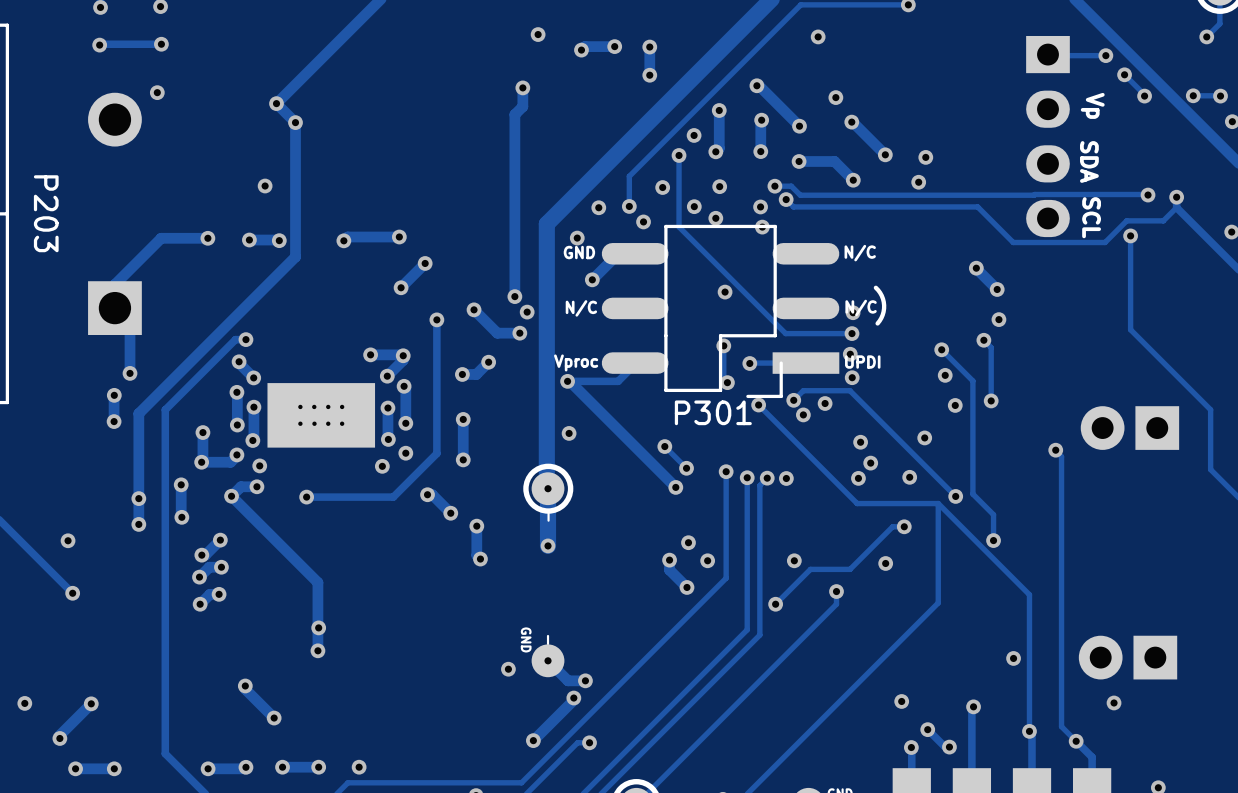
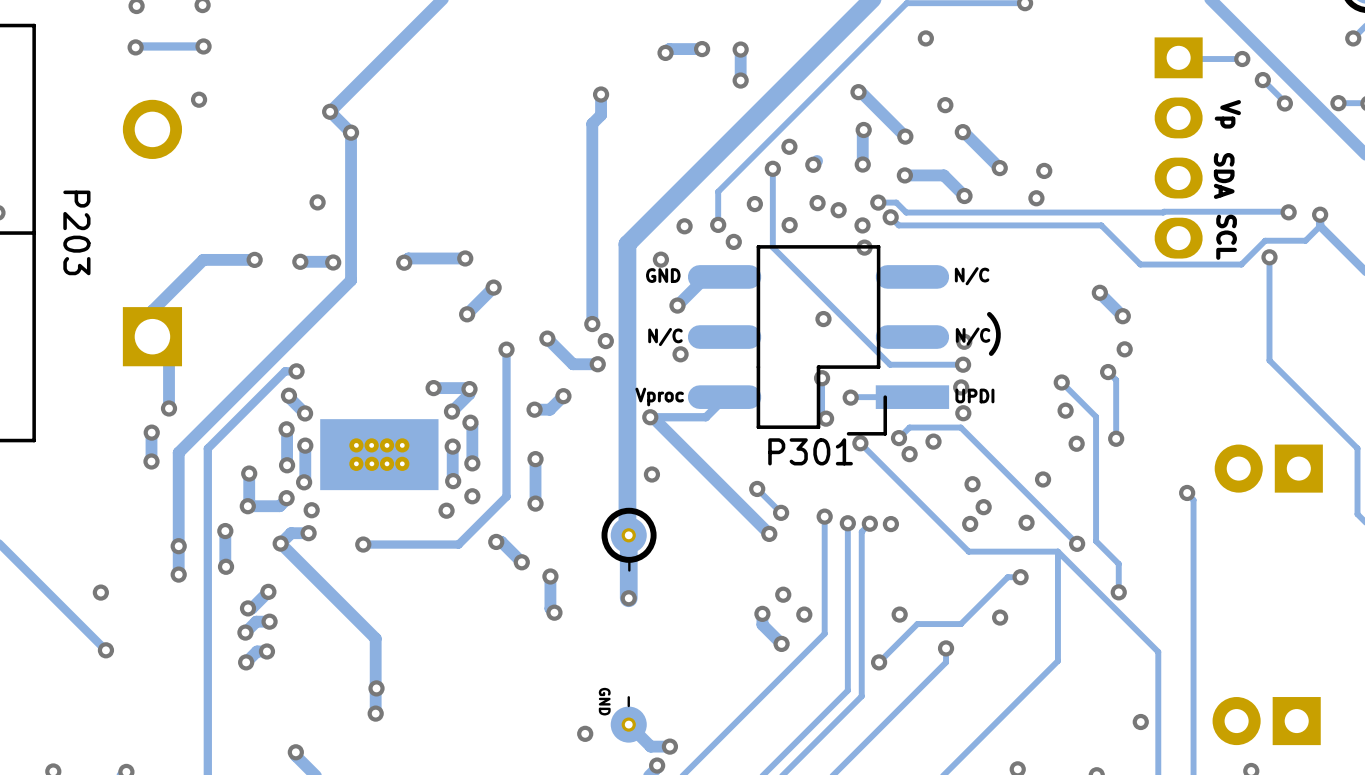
via: (538, 34) -> none
track: (719, 110) (719, 148) -> none
via: (719, 110) -> none
via position: (715, 218) -> (838, 210)
via: none -> (680, 354)

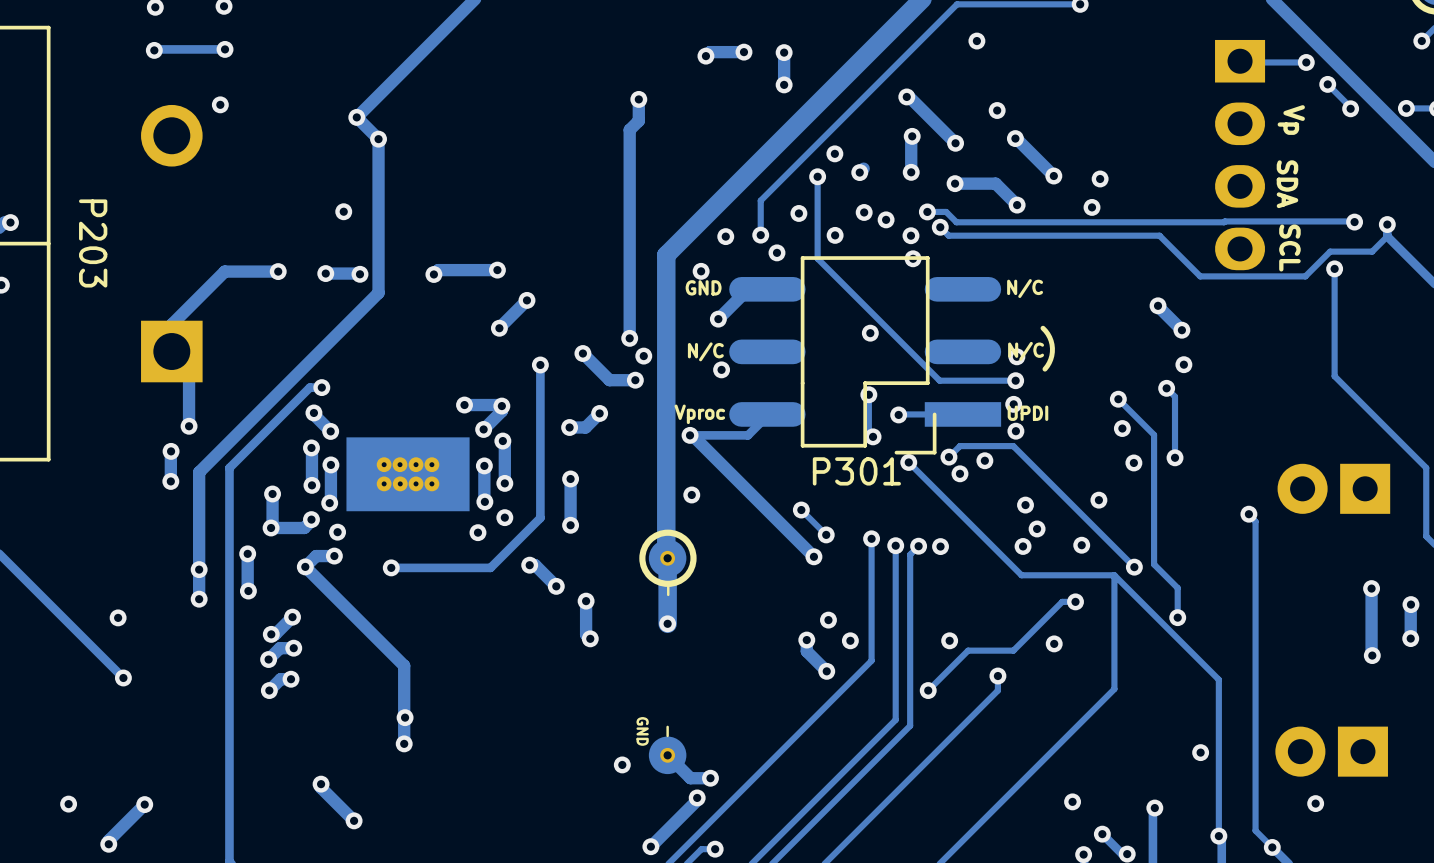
track: none -> (1371, 588) (1372, 655)
via: none -> (1371, 588)
via: none -> (1410, 604)
track: none -> (1410, 604) (1410, 638)
via: none -> (1410, 638)
via: none -> (1372, 655)

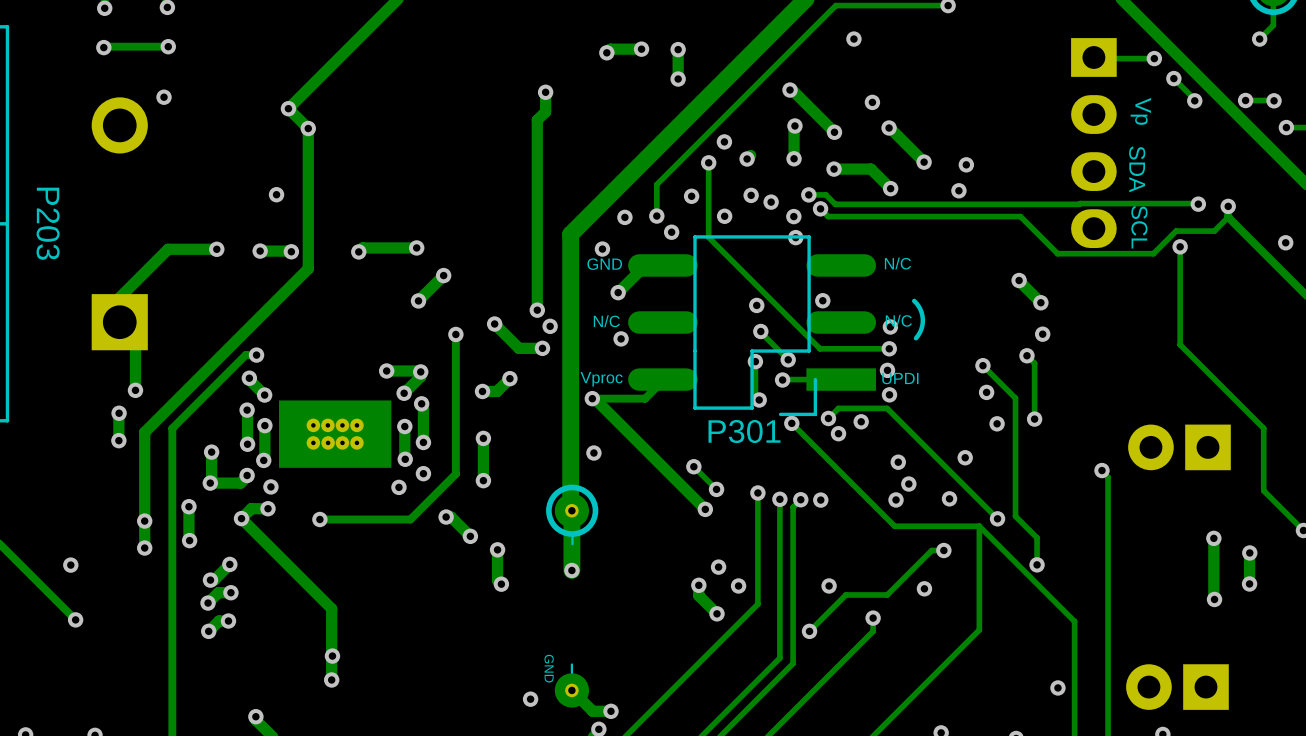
via: none -> (822, 300)
track: none -> (760, 331) (788, 359)
via: none -> (760, 331)
via: none -> (788, 359)

